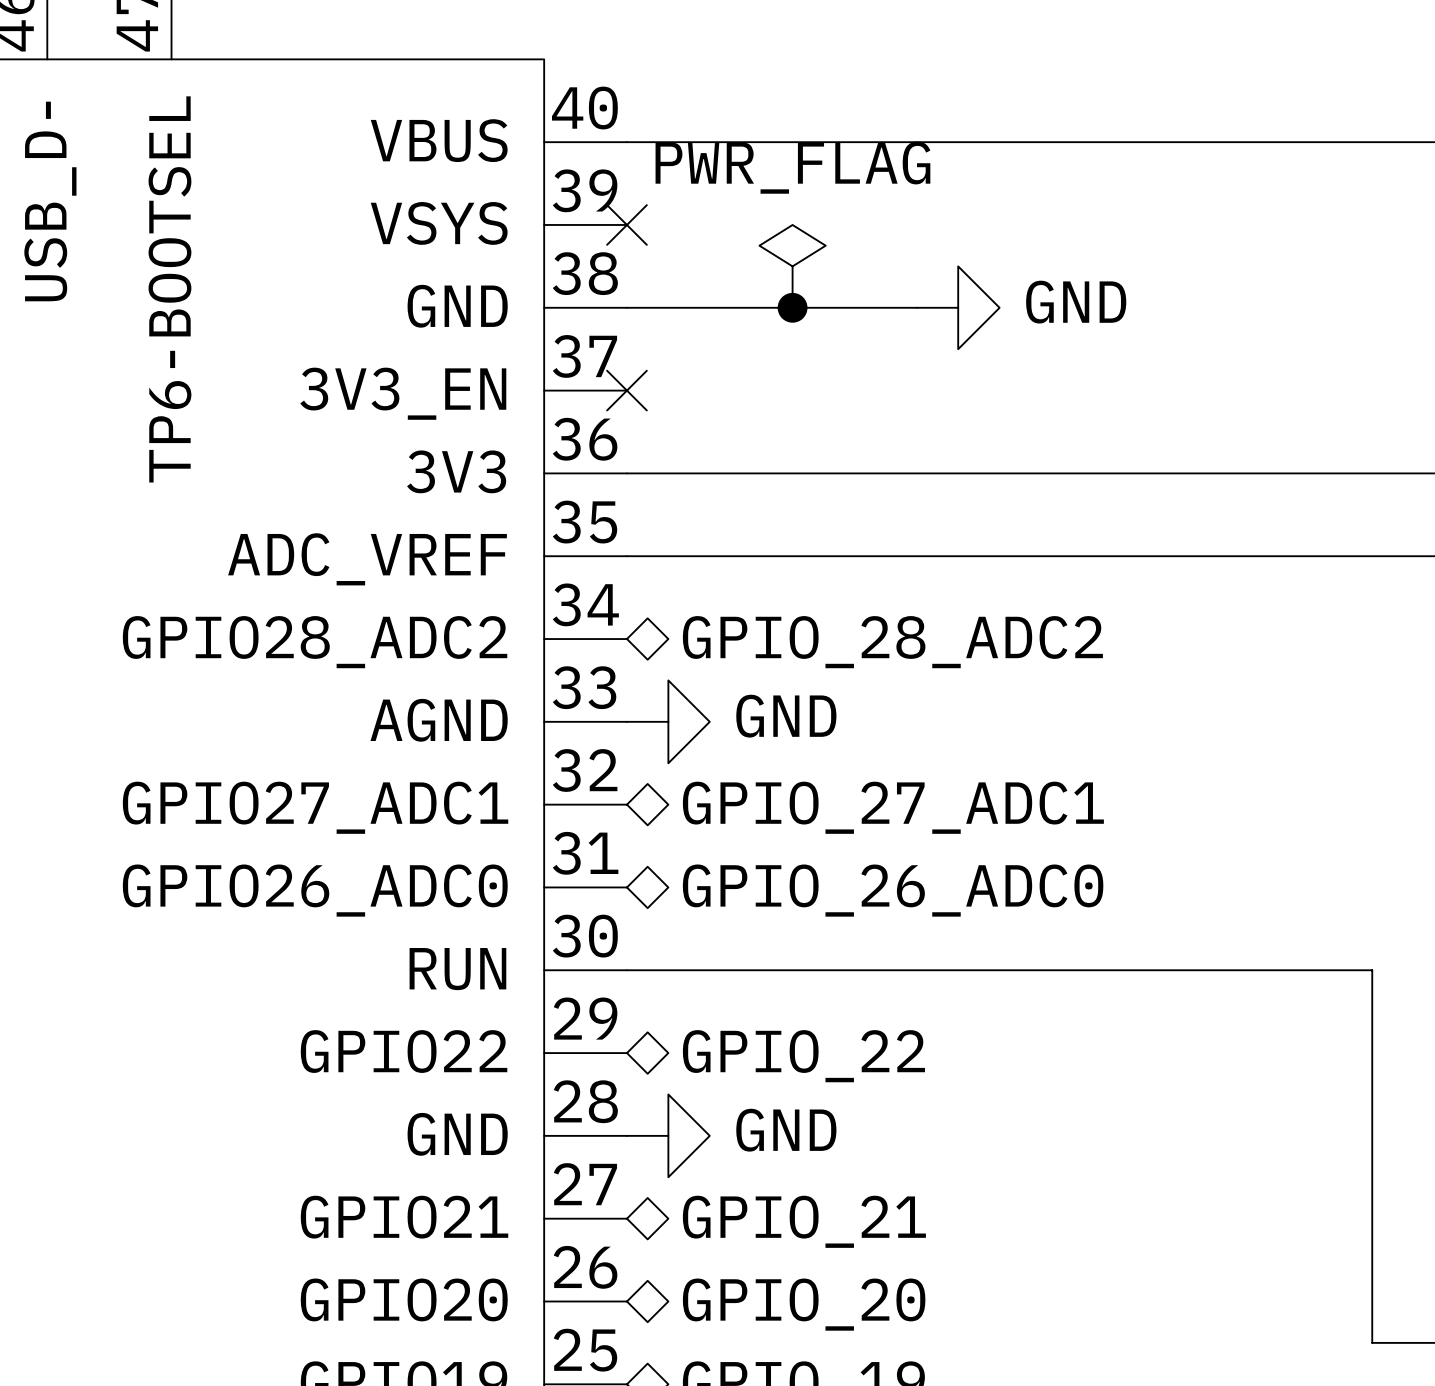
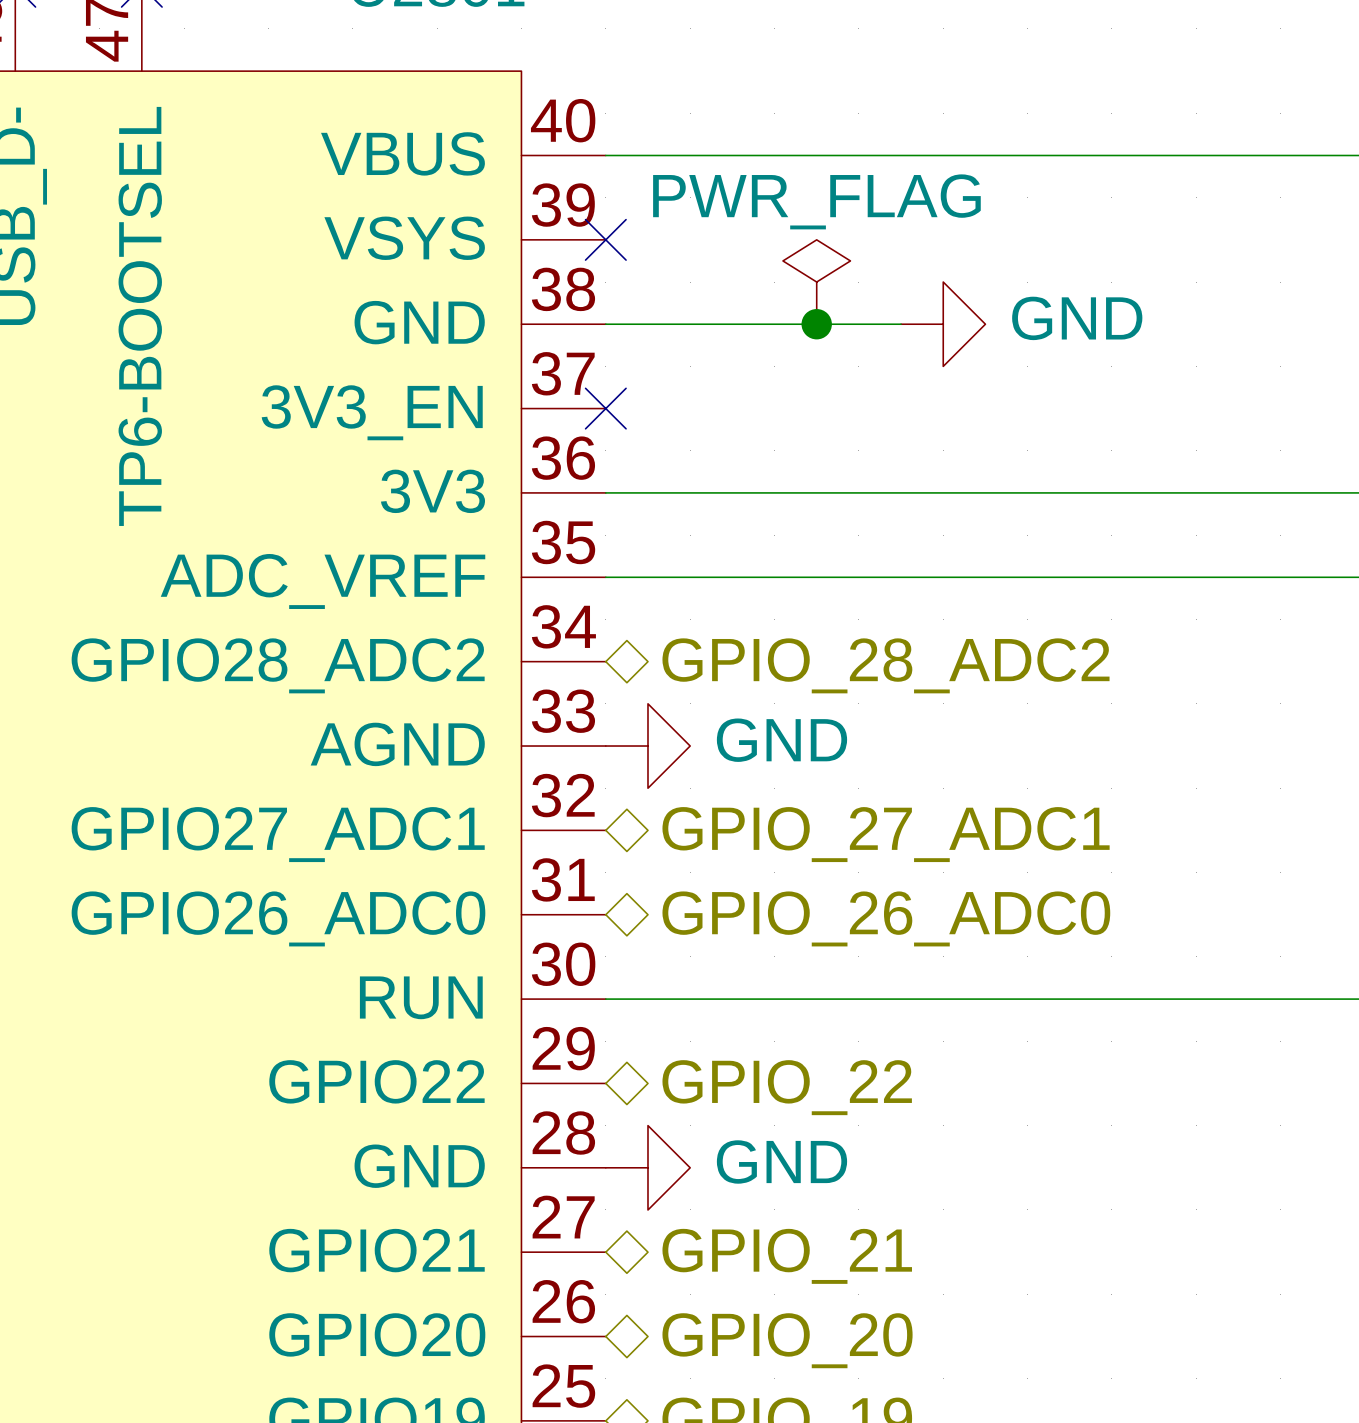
power symbol text position: PWR_FLAG (792, 167) -> PWR_FLAG (816, 201)
power symbol position: PWR_FLAG (792, 266) -> PWR_FLAG (816, 282)
junction position: (792, 307) -> (816, 324)

